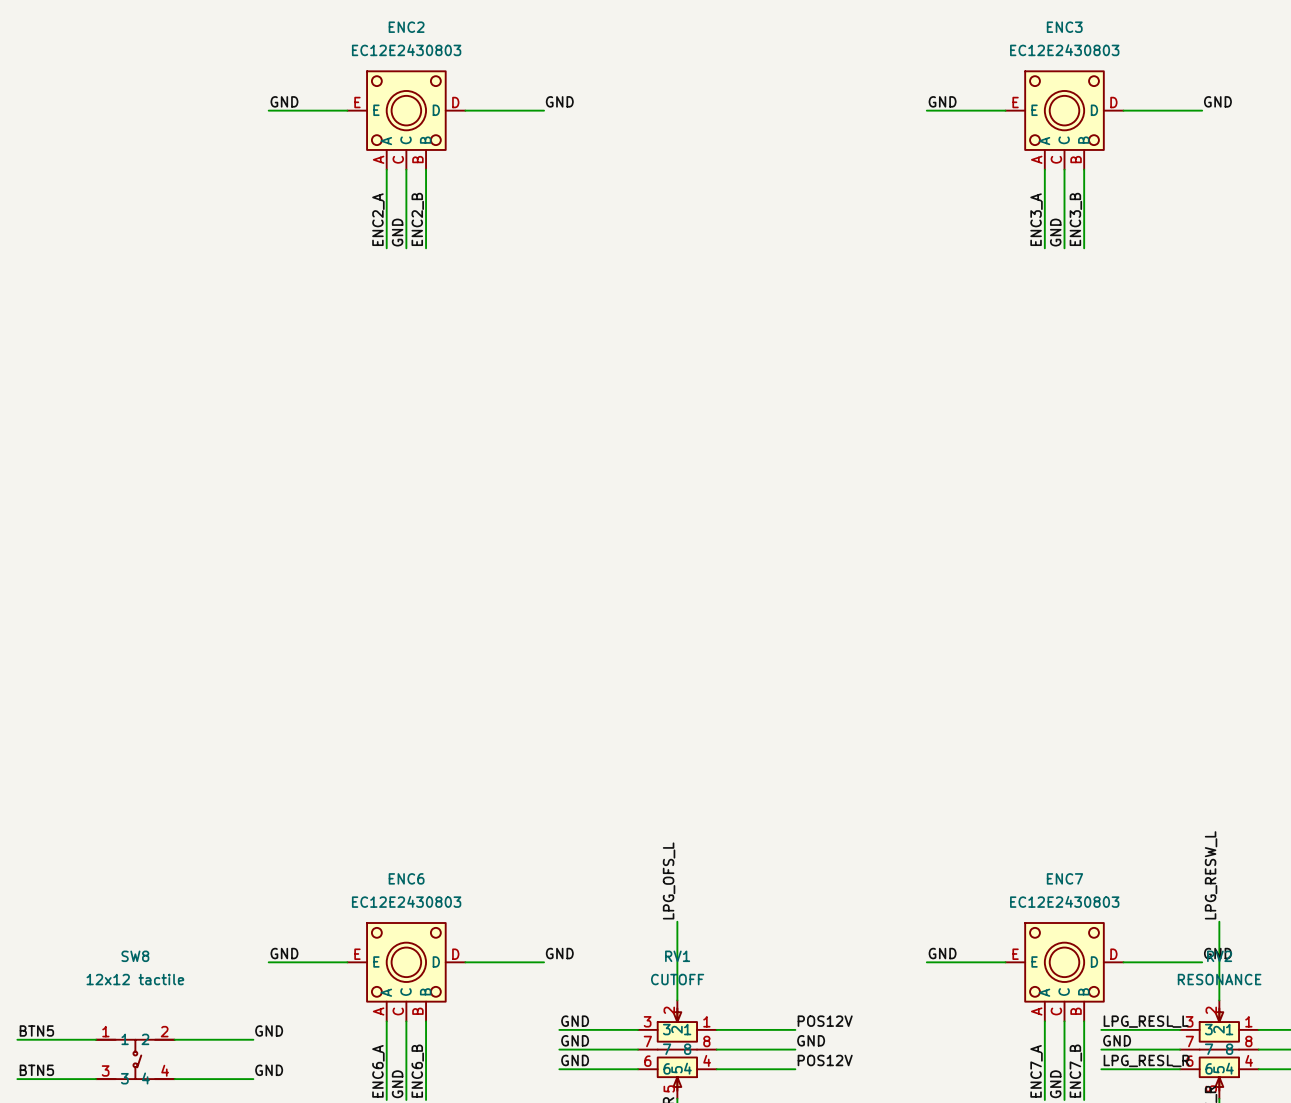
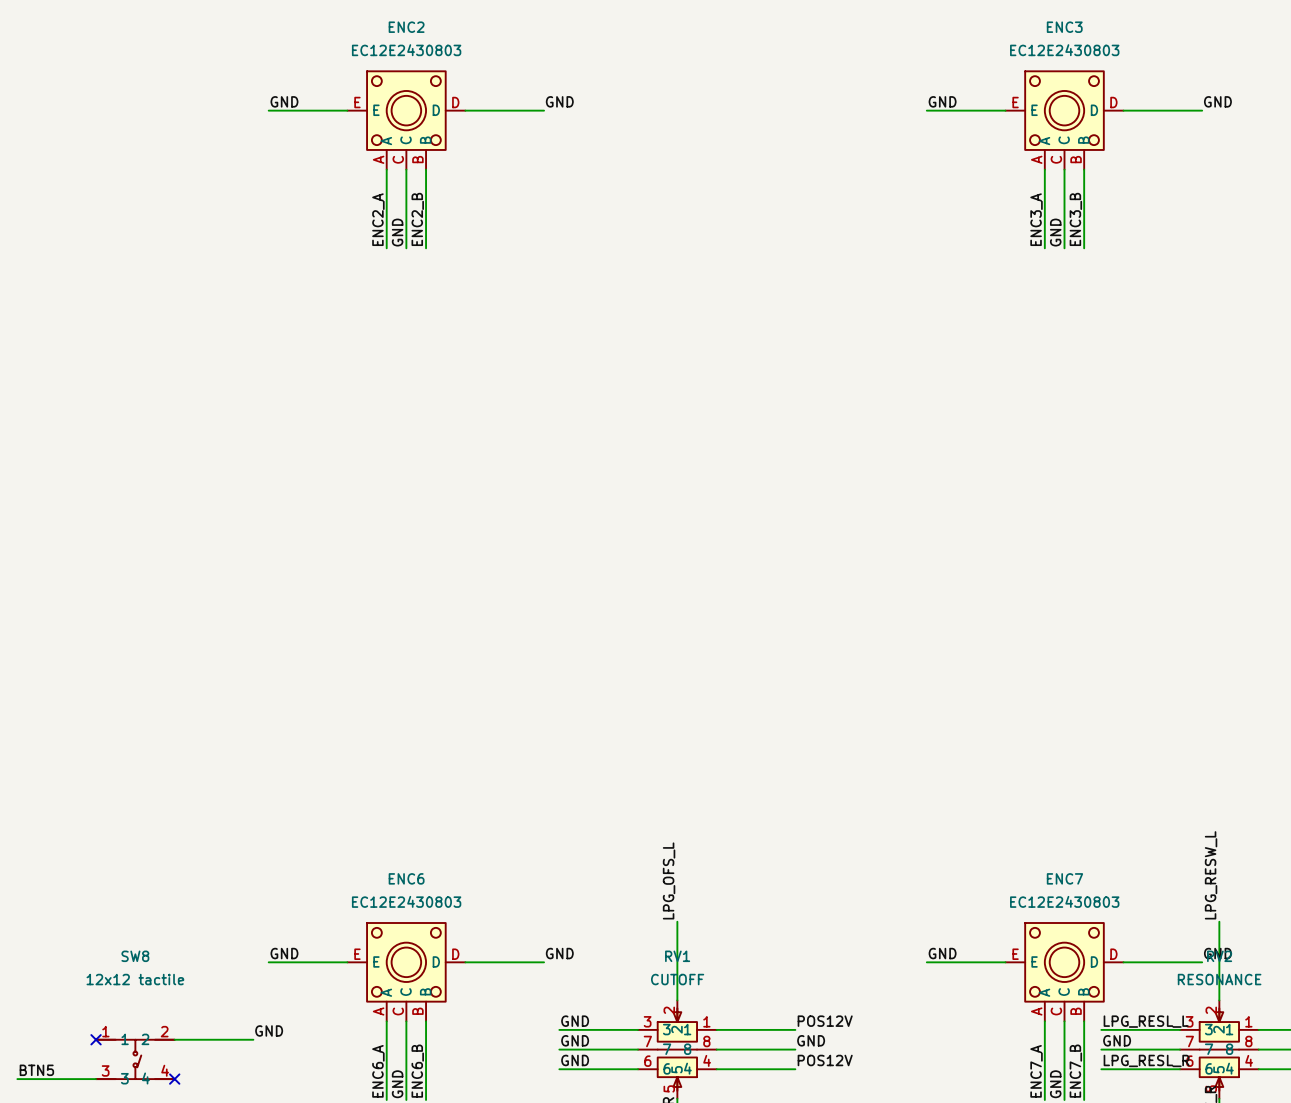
label: BTN5 (36, 1030) -> none
wire: (17, 1039) (96, 1039) -> none
no-connect mark: none -> (96, 1039)
label: GND (269, 1070) -> none
wire: (174, 1079) (253, 1079) -> none
no-connect mark: none -> (174, 1079)

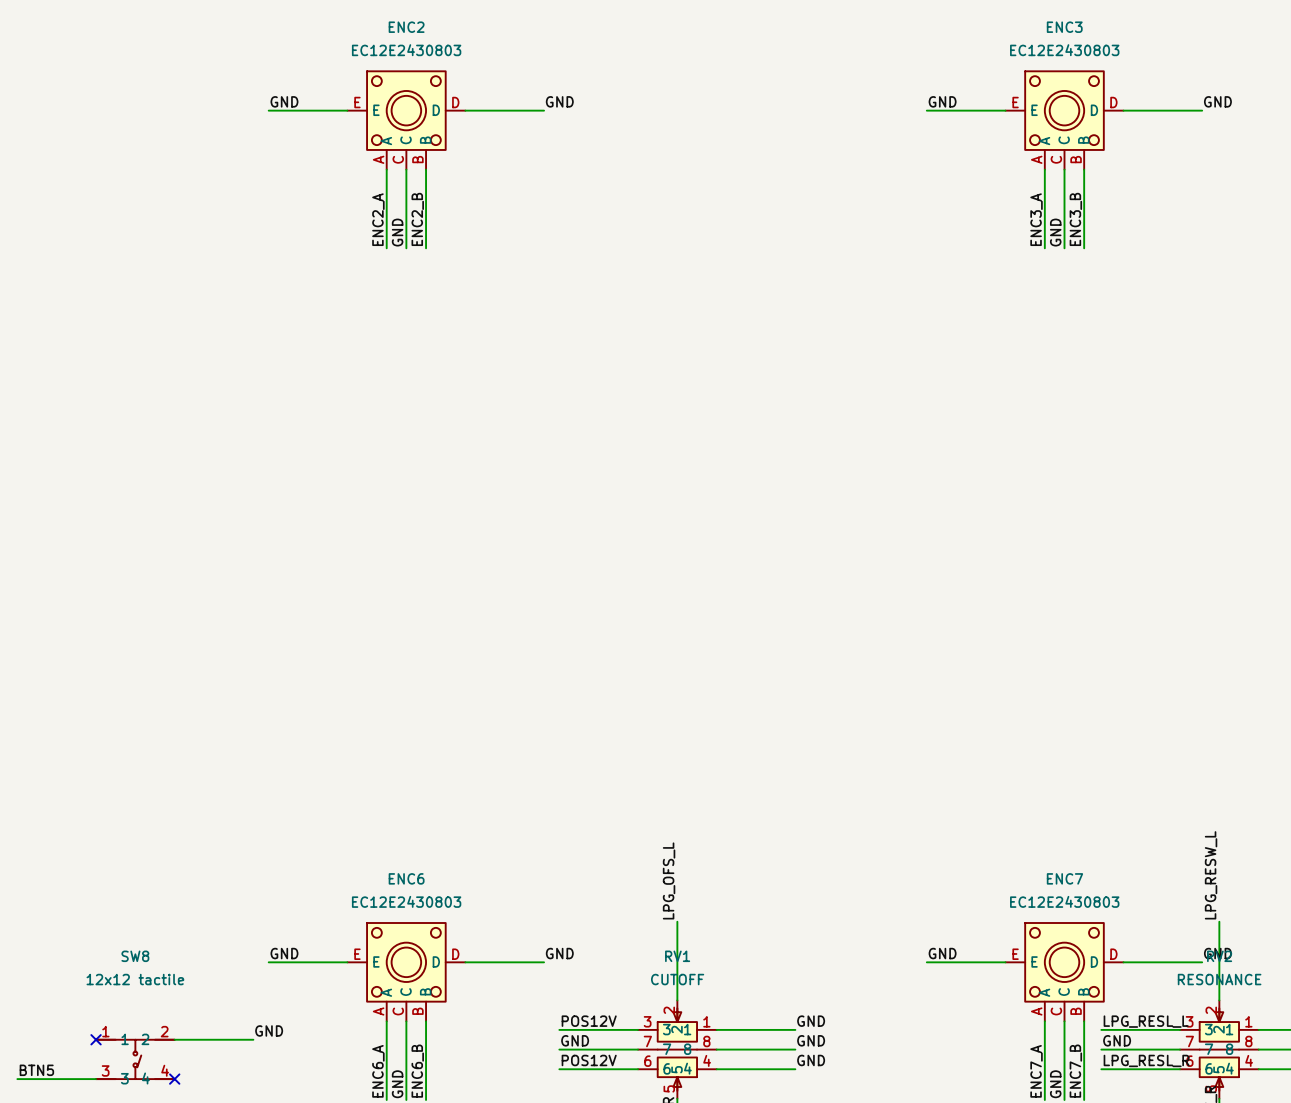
label: GND (575, 1021) -> POS12V (589, 1021)
label: POS12V (825, 1021) -> GND (811, 1021)
label: GND (575, 1060) -> POS12V (589, 1060)
label: POS12V (825, 1060) -> GND (811, 1060)

